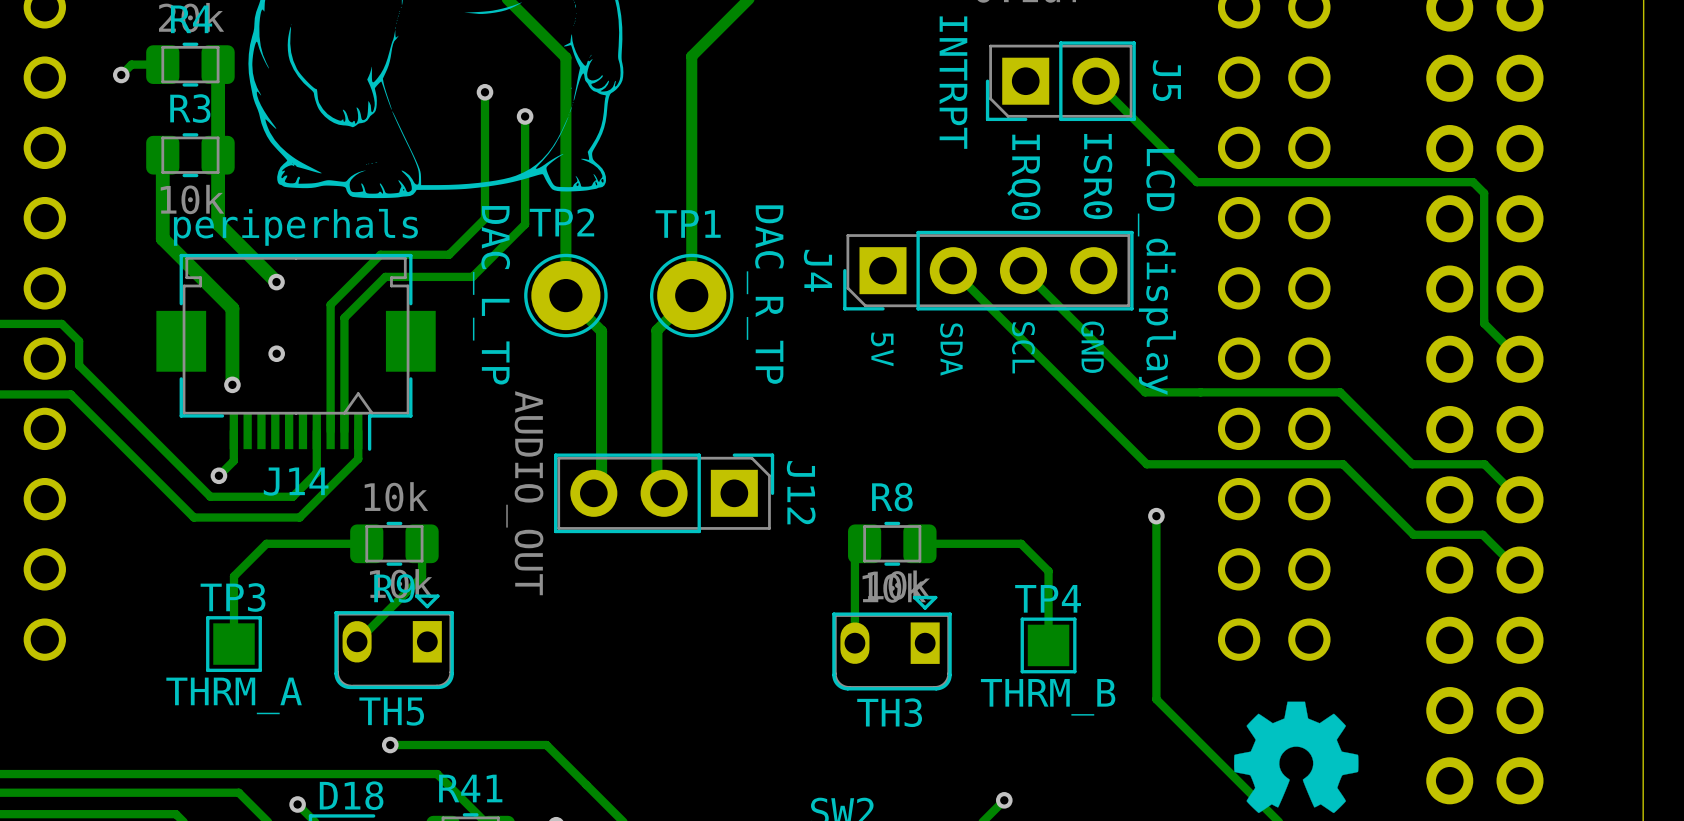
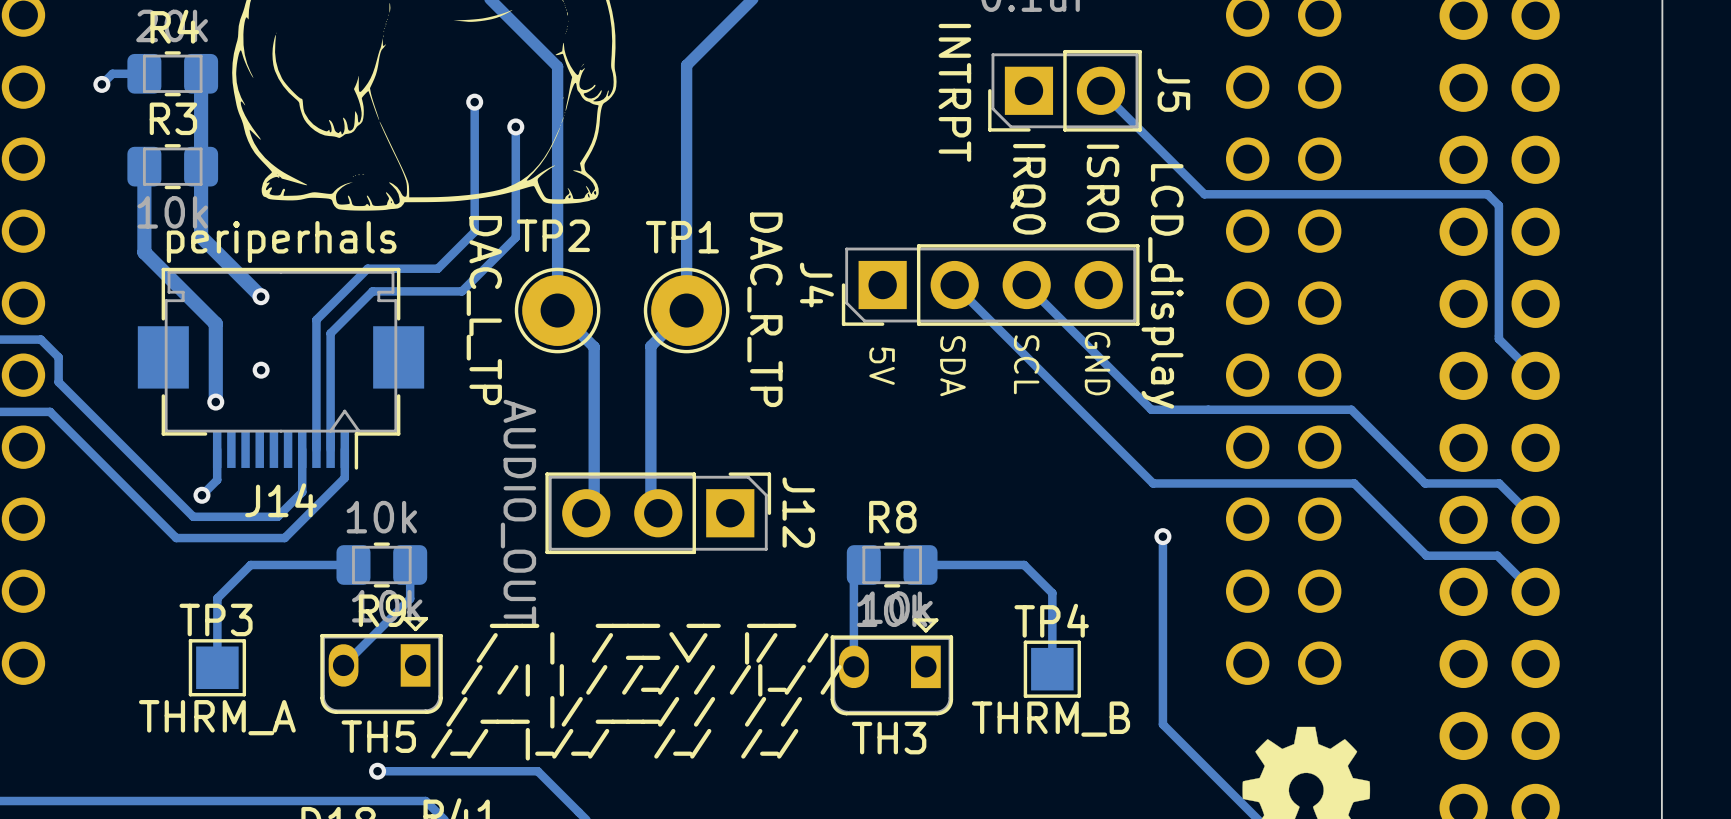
text: none -> ___ ____ __ ___ (643, 625)
text: none -> / | / __ \/ |/ / (652, 648)
text: none -> / /| | / /_/ / /|_/ / (651, 680)
text: none -> / ___ |/ ____/ / / / (624, 712)
text: none -> /_/ |_/_/ /_/ /_/ (614, 744)

